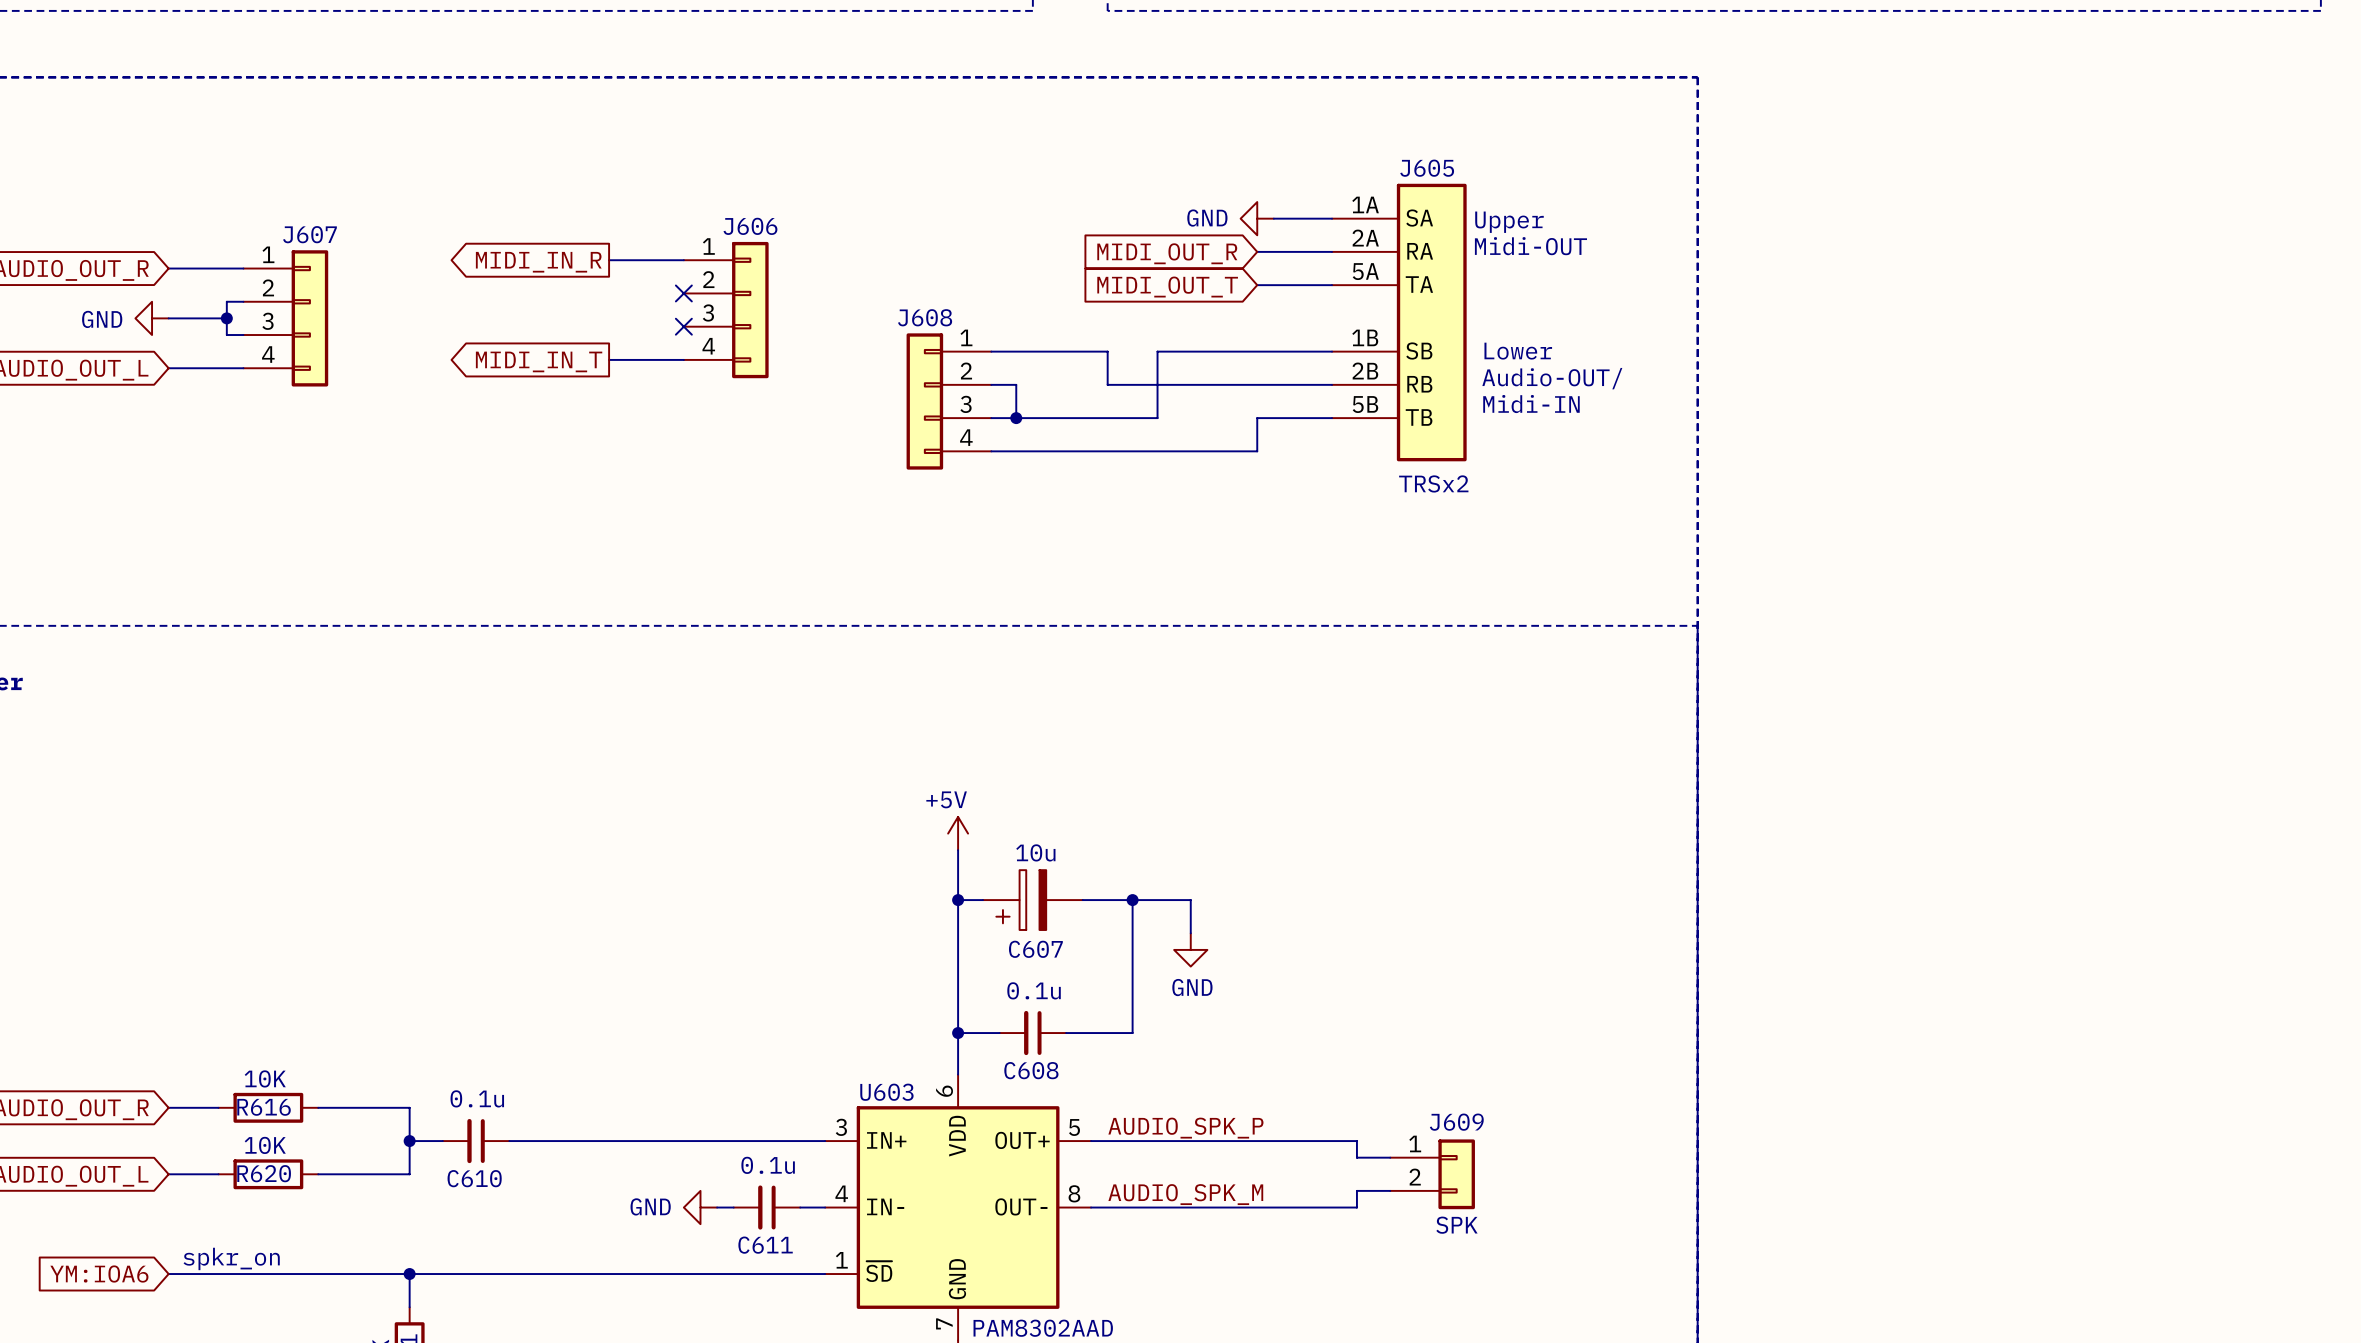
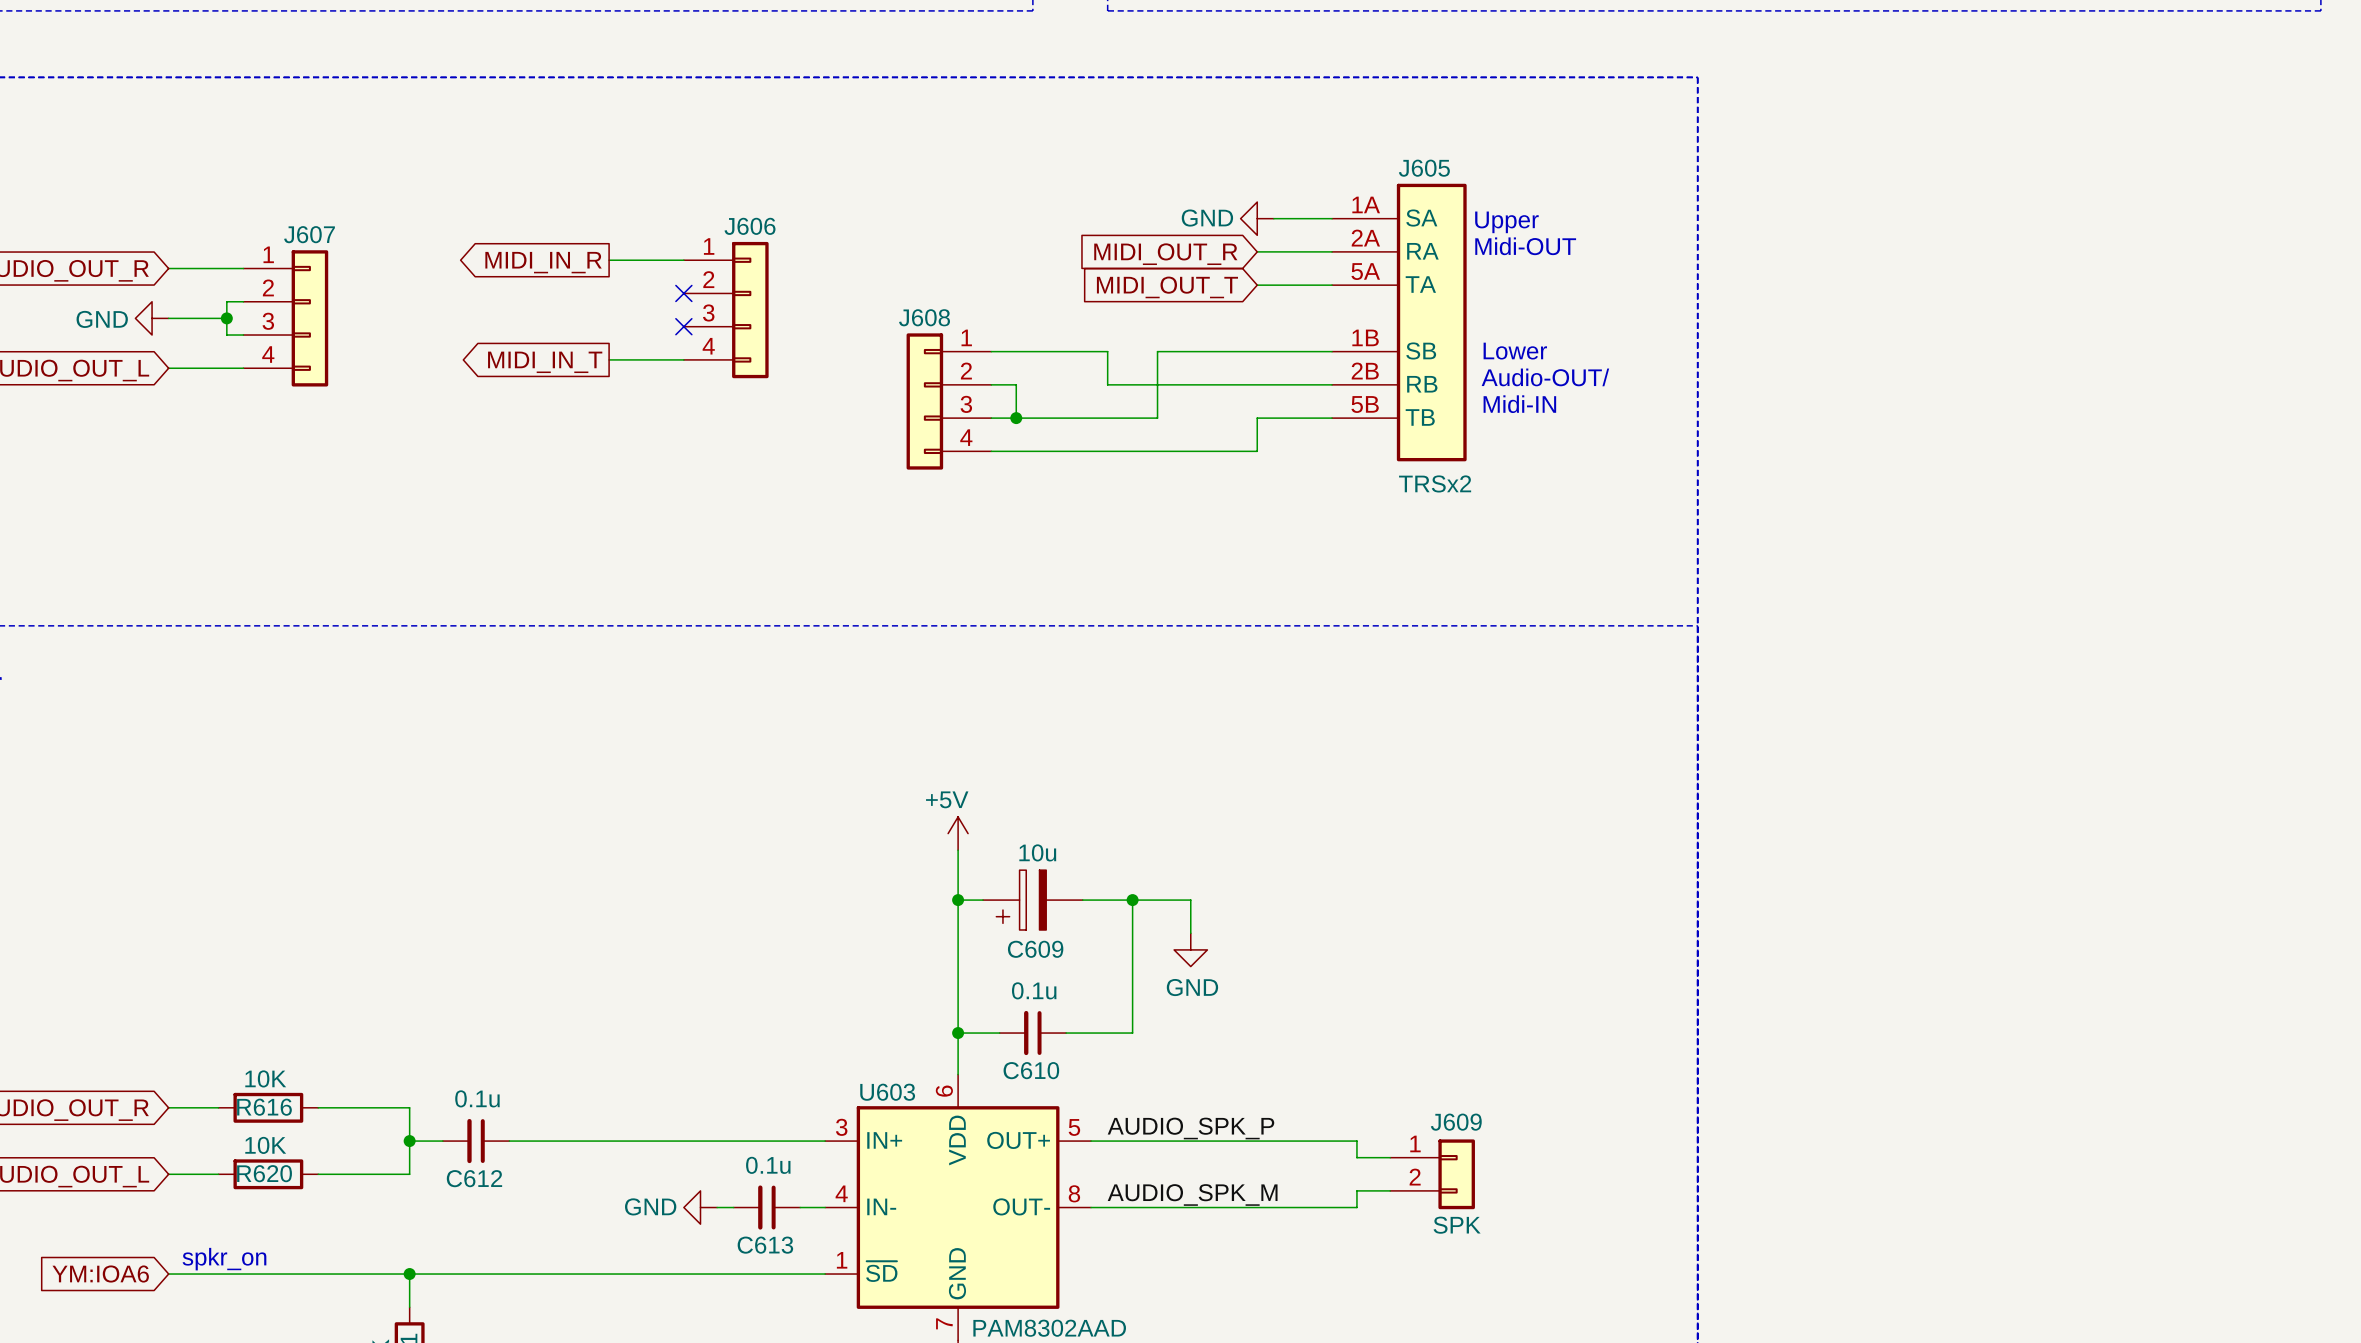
C607 name: C607 (1035, 949) -> C609 (1035, 949)
C608 name: C608 (1031, 1070) -> C610 (1031, 1070)
C610 name: C610 (474, 1178) -> C612 (474, 1178)
C611 name: C611 (765, 1245) -> C613 (765, 1245)

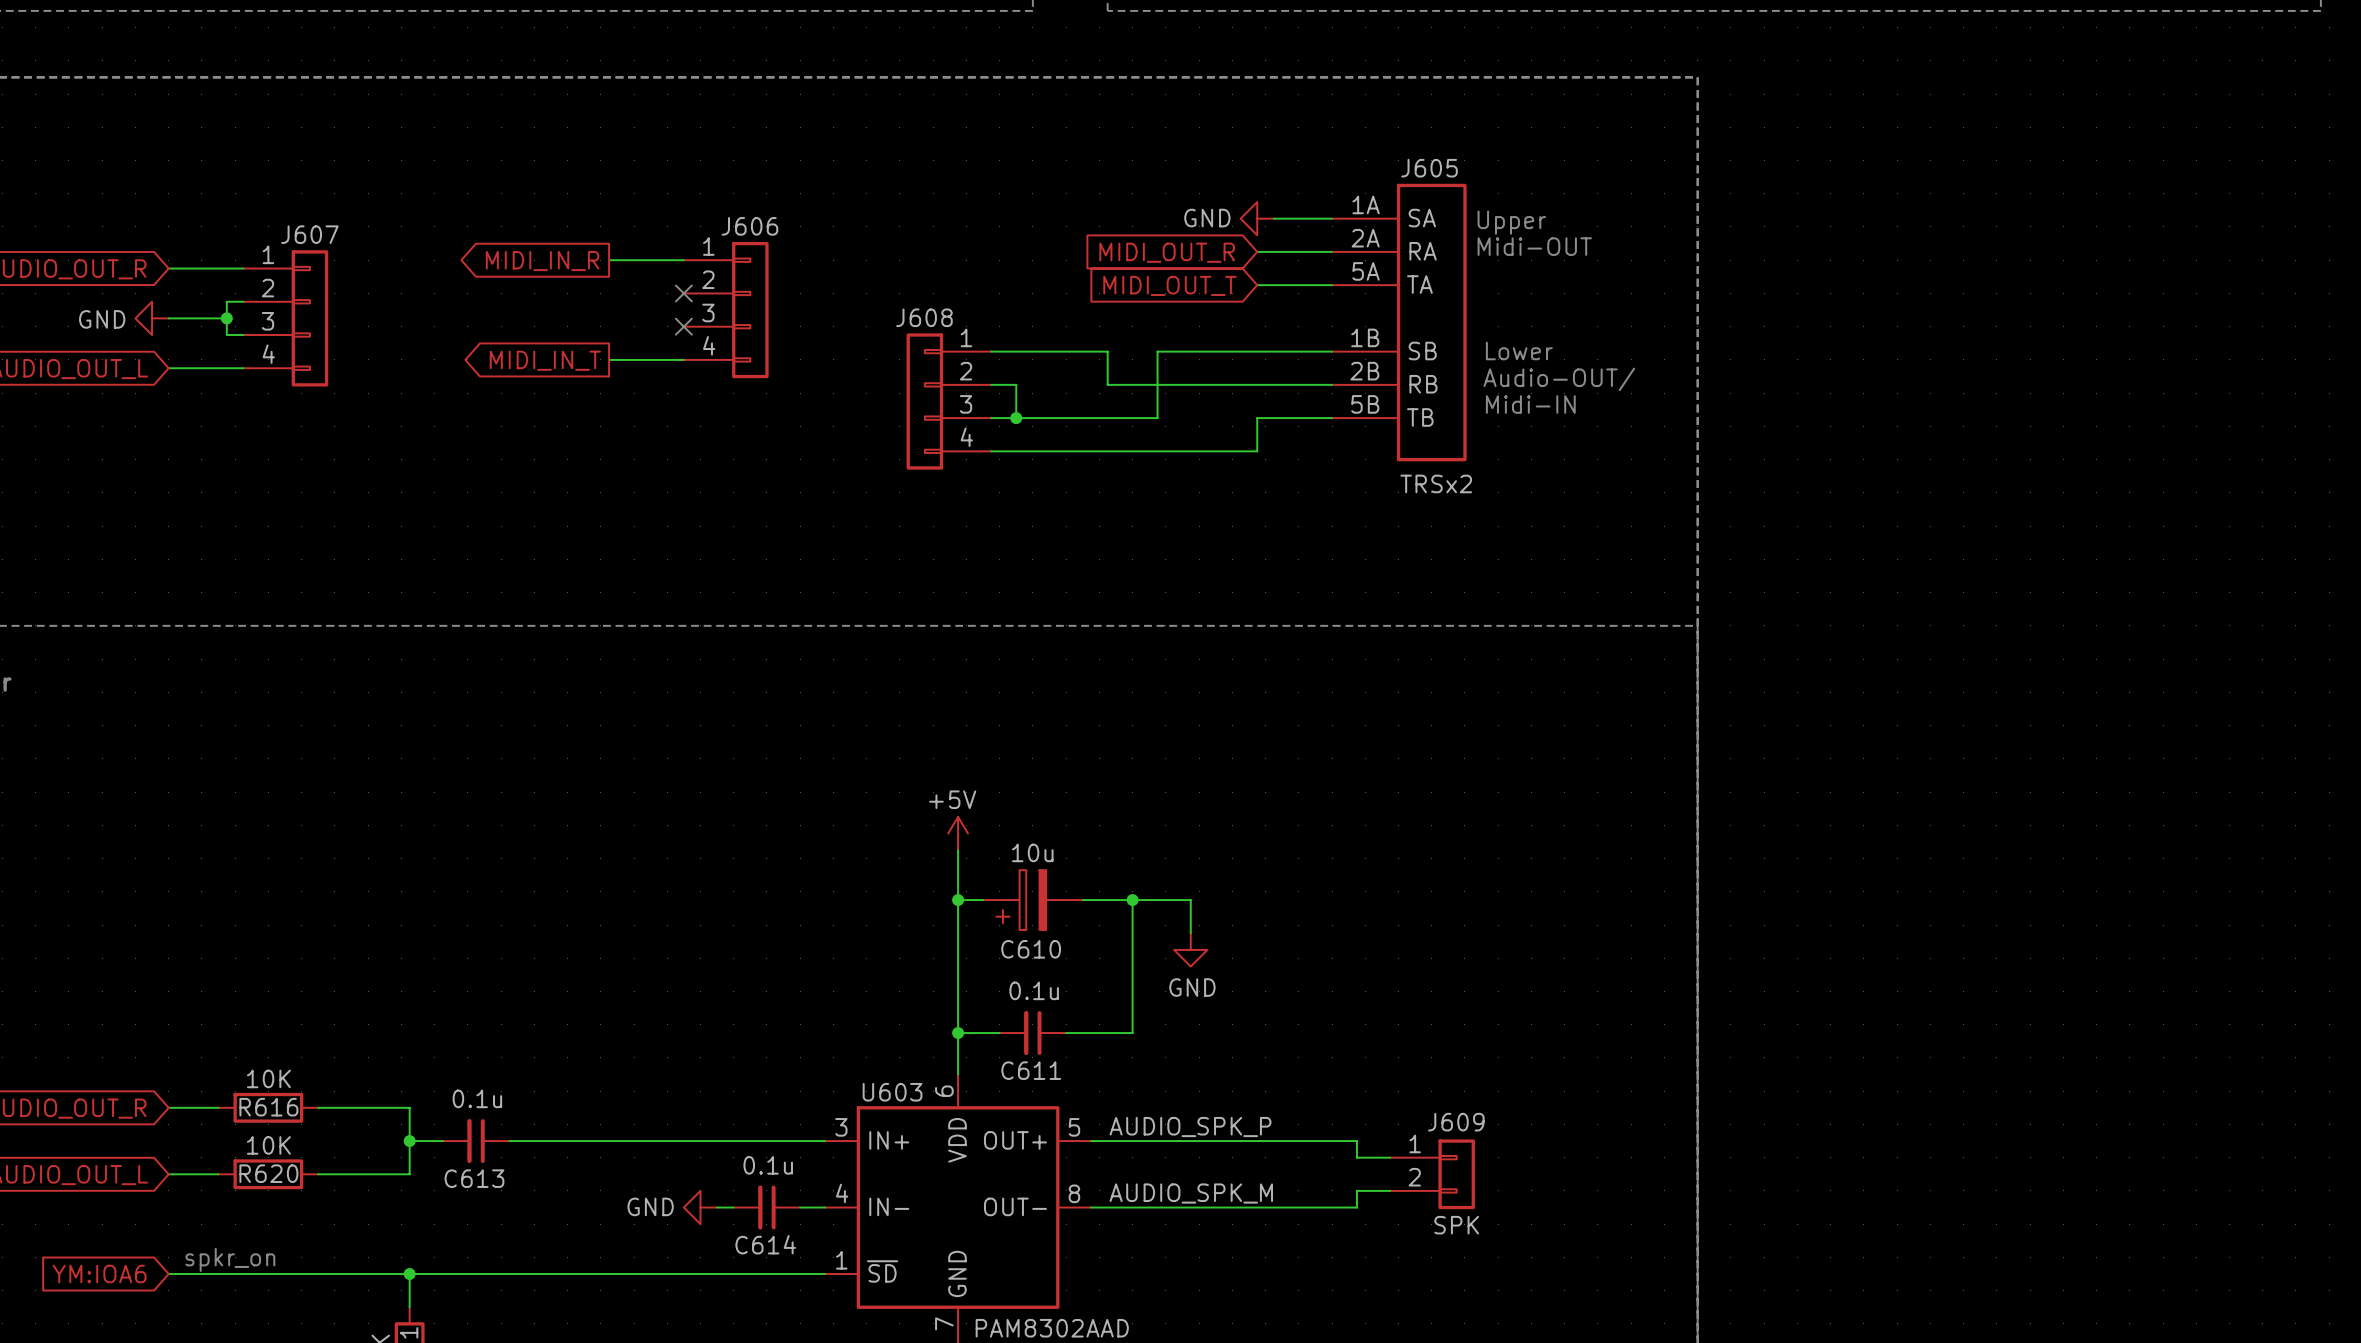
C609 name: C609 (1035, 949) -> C610 (1031, 949)
C610 name: C610 (1031, 1070) -> C611 (1031, 1070)
C612 name: C612 (474, 1178) -> C613 (474, 1178)
C613 name: C613 (765, 1245) -> C614 (765, 1244)

